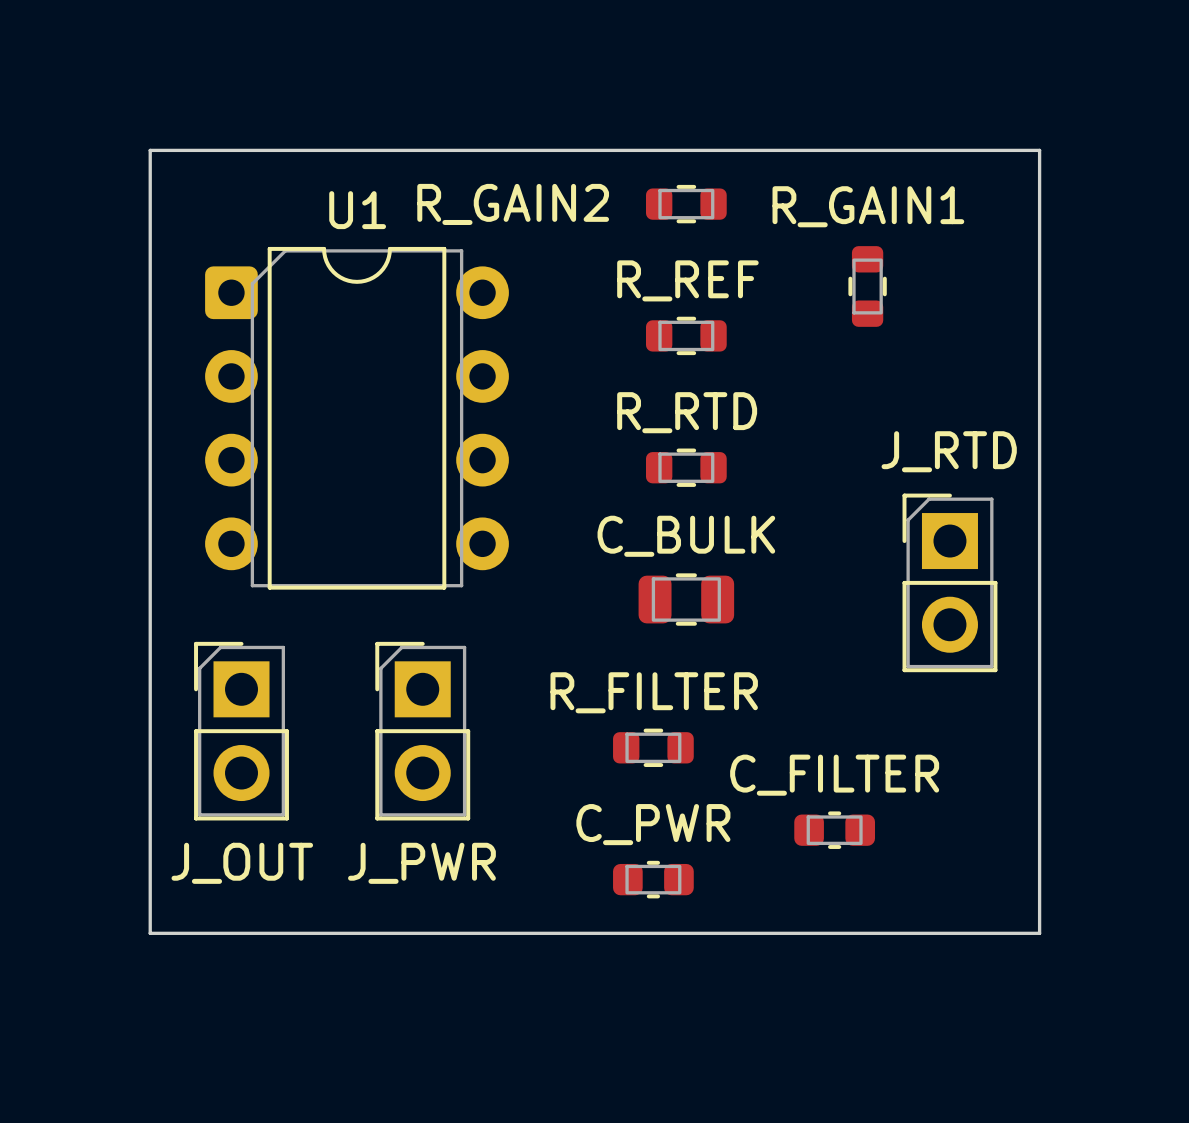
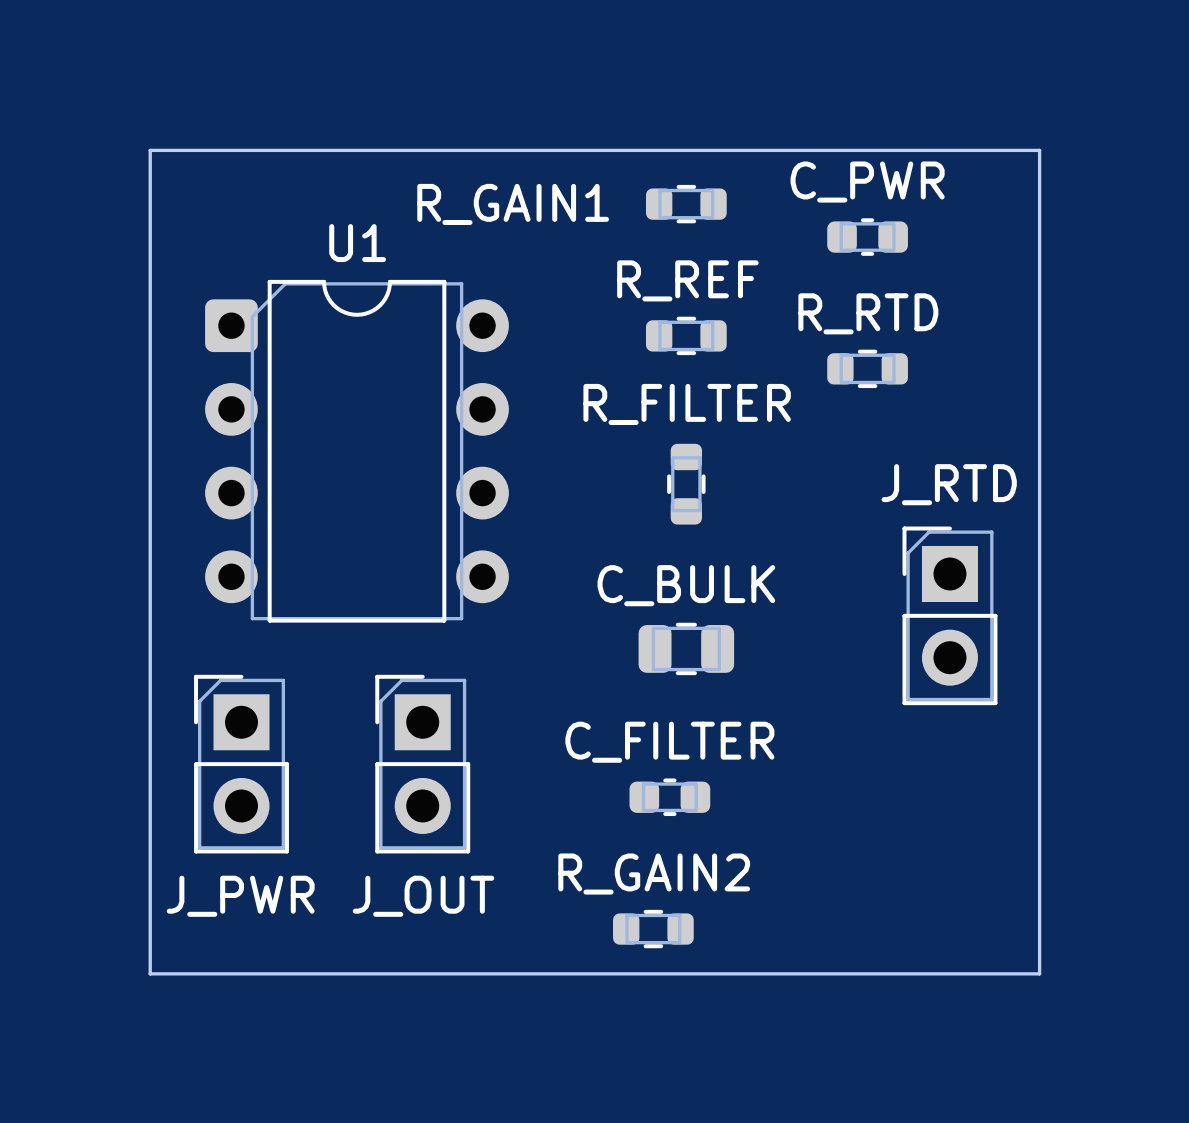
R_GAIN2 name: R_GAIN2 (513, 204) -> R_GAIN1 (513, 204)
R_GAIN1: (867, 286) -> none
U1 position: (357, 418) -> (357, 451)
R_RTD position: (686, 467) -> (867, 368)
J_RTD position: (949, 582) -> (949, 615)
C_BULK position: (686, 599) -> (686, 648)
J_OUT position: (241, 731) -> (422, 764)
J_PWR position: (422, 731) -> (241, 764)
R_FILTER rotation: 0° (653, 747) -> 90° clockwise (686, 484)
R_FILTER position: (653, 747) -> (686, 484)
C_FILTER position: (834, 830) -> (669, 797)
C_PWR position: (653, 879) -> (867, 237)
R_GAIN2: none -> (653, 929)
board edge: (150, 933) (1039, 933) -> (150, 933) (150, 973) (1039, 973) (1039, 933)

